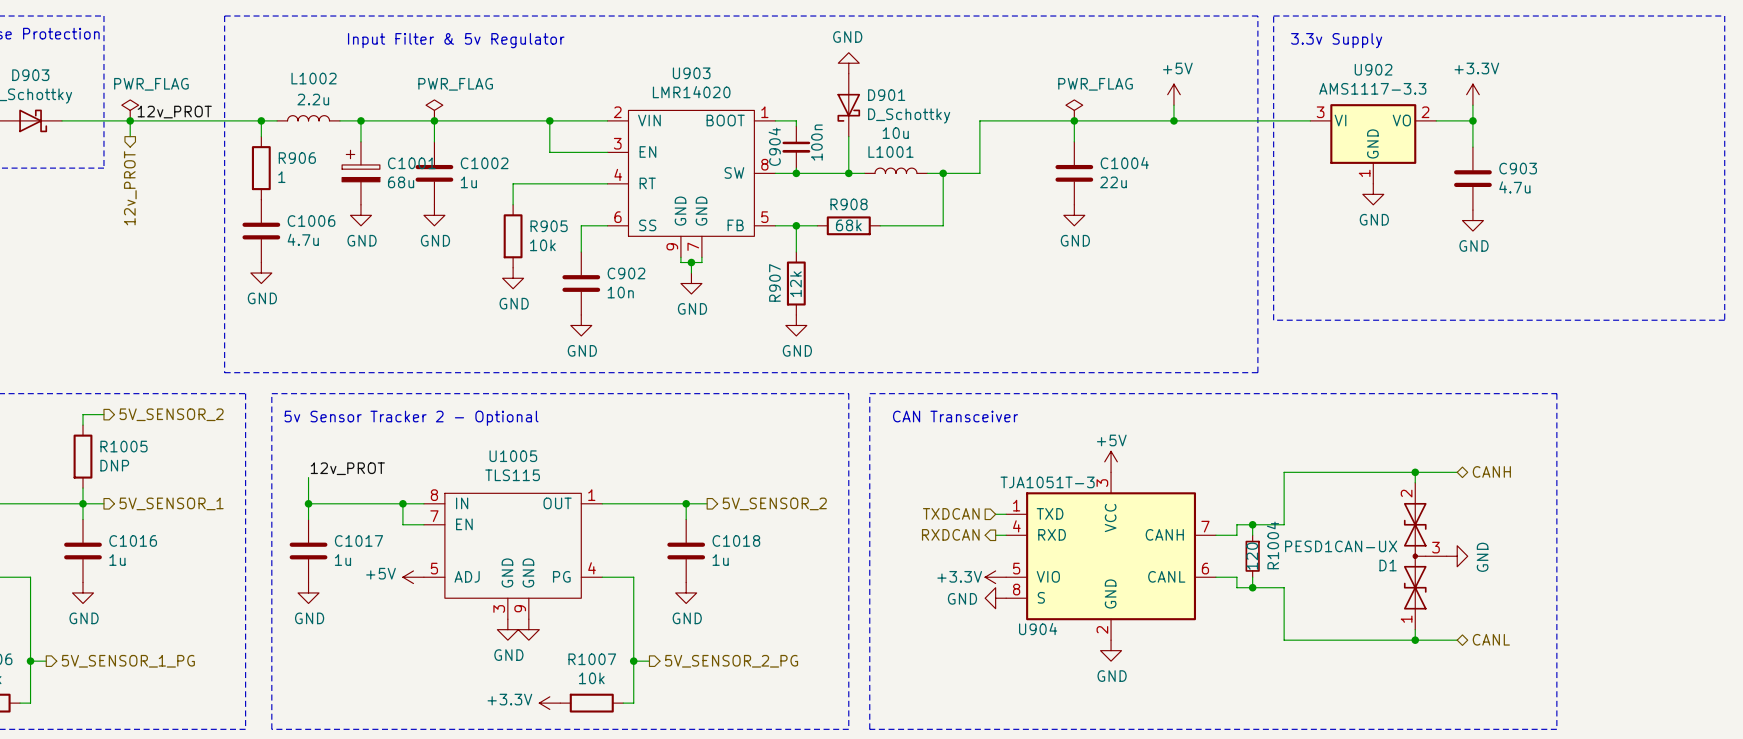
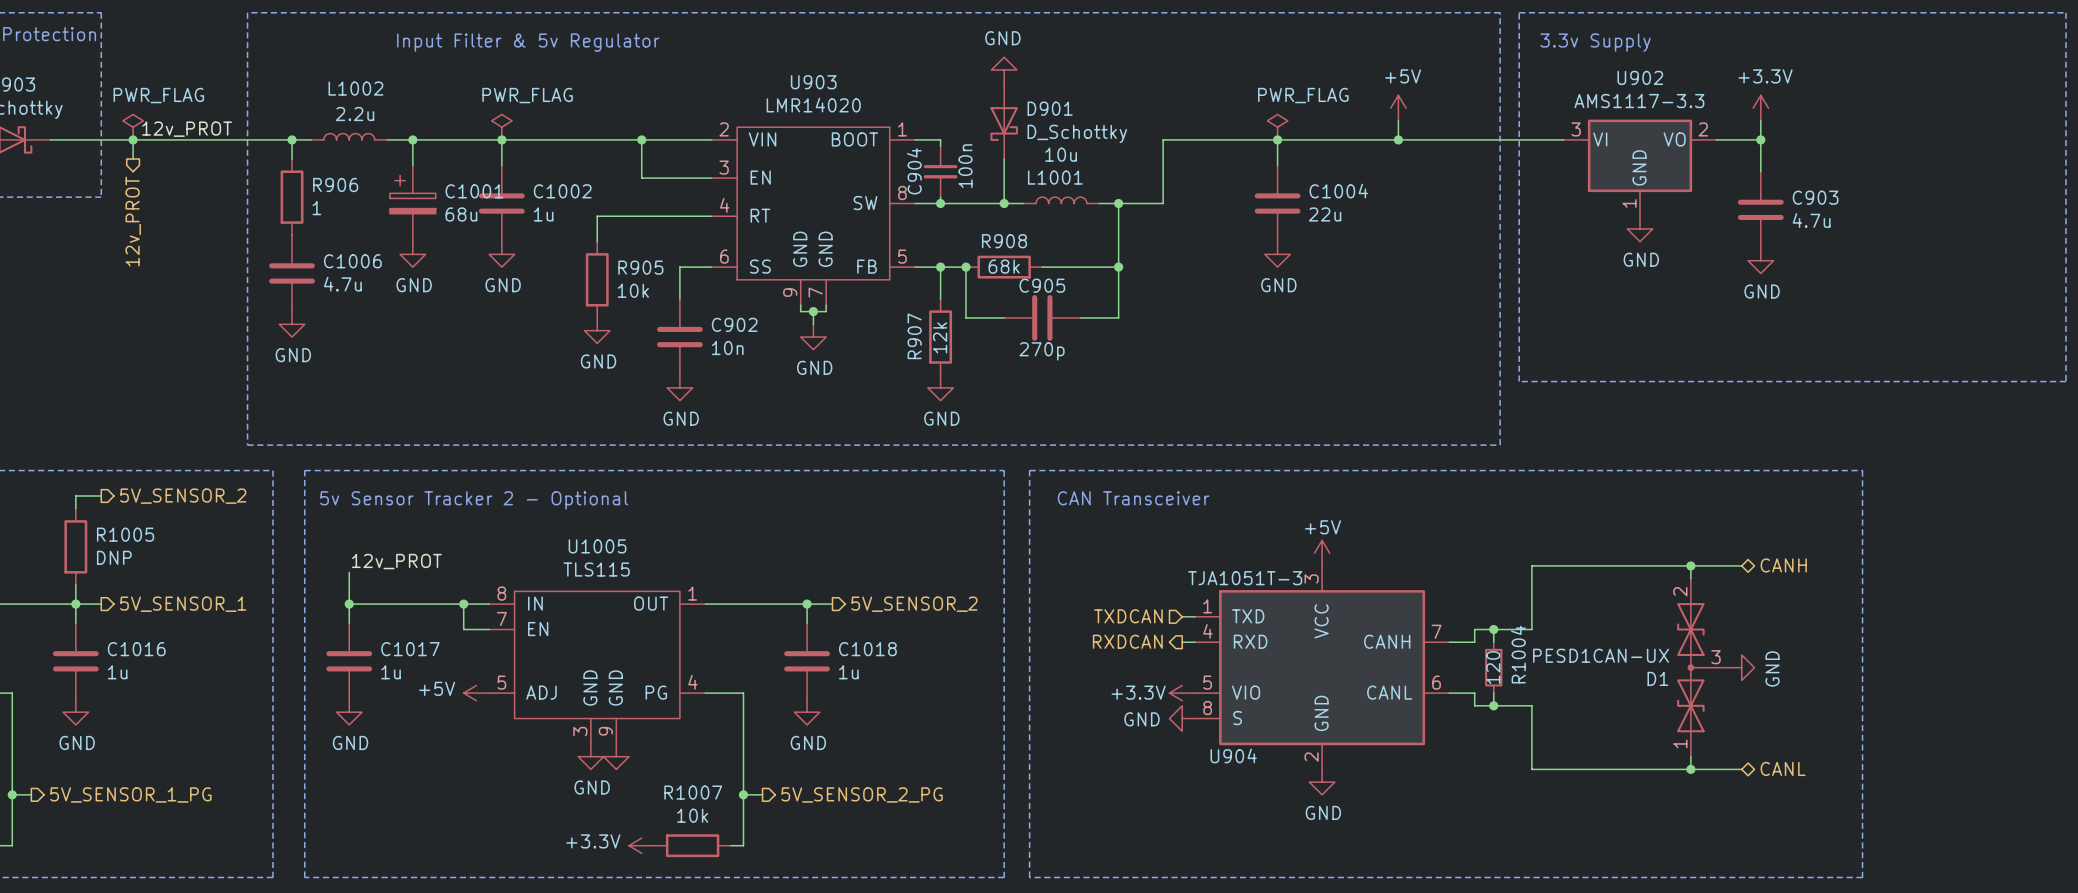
wire: none -> (966, 267) (966, 317) (1004, 317)
junction: none -> (966, 267)
wire: none -> (1118, 267) (1118, 317) (1080, 317)
junction: none -> (1118, 267)
C905: none -> 270p (1042, 317)

